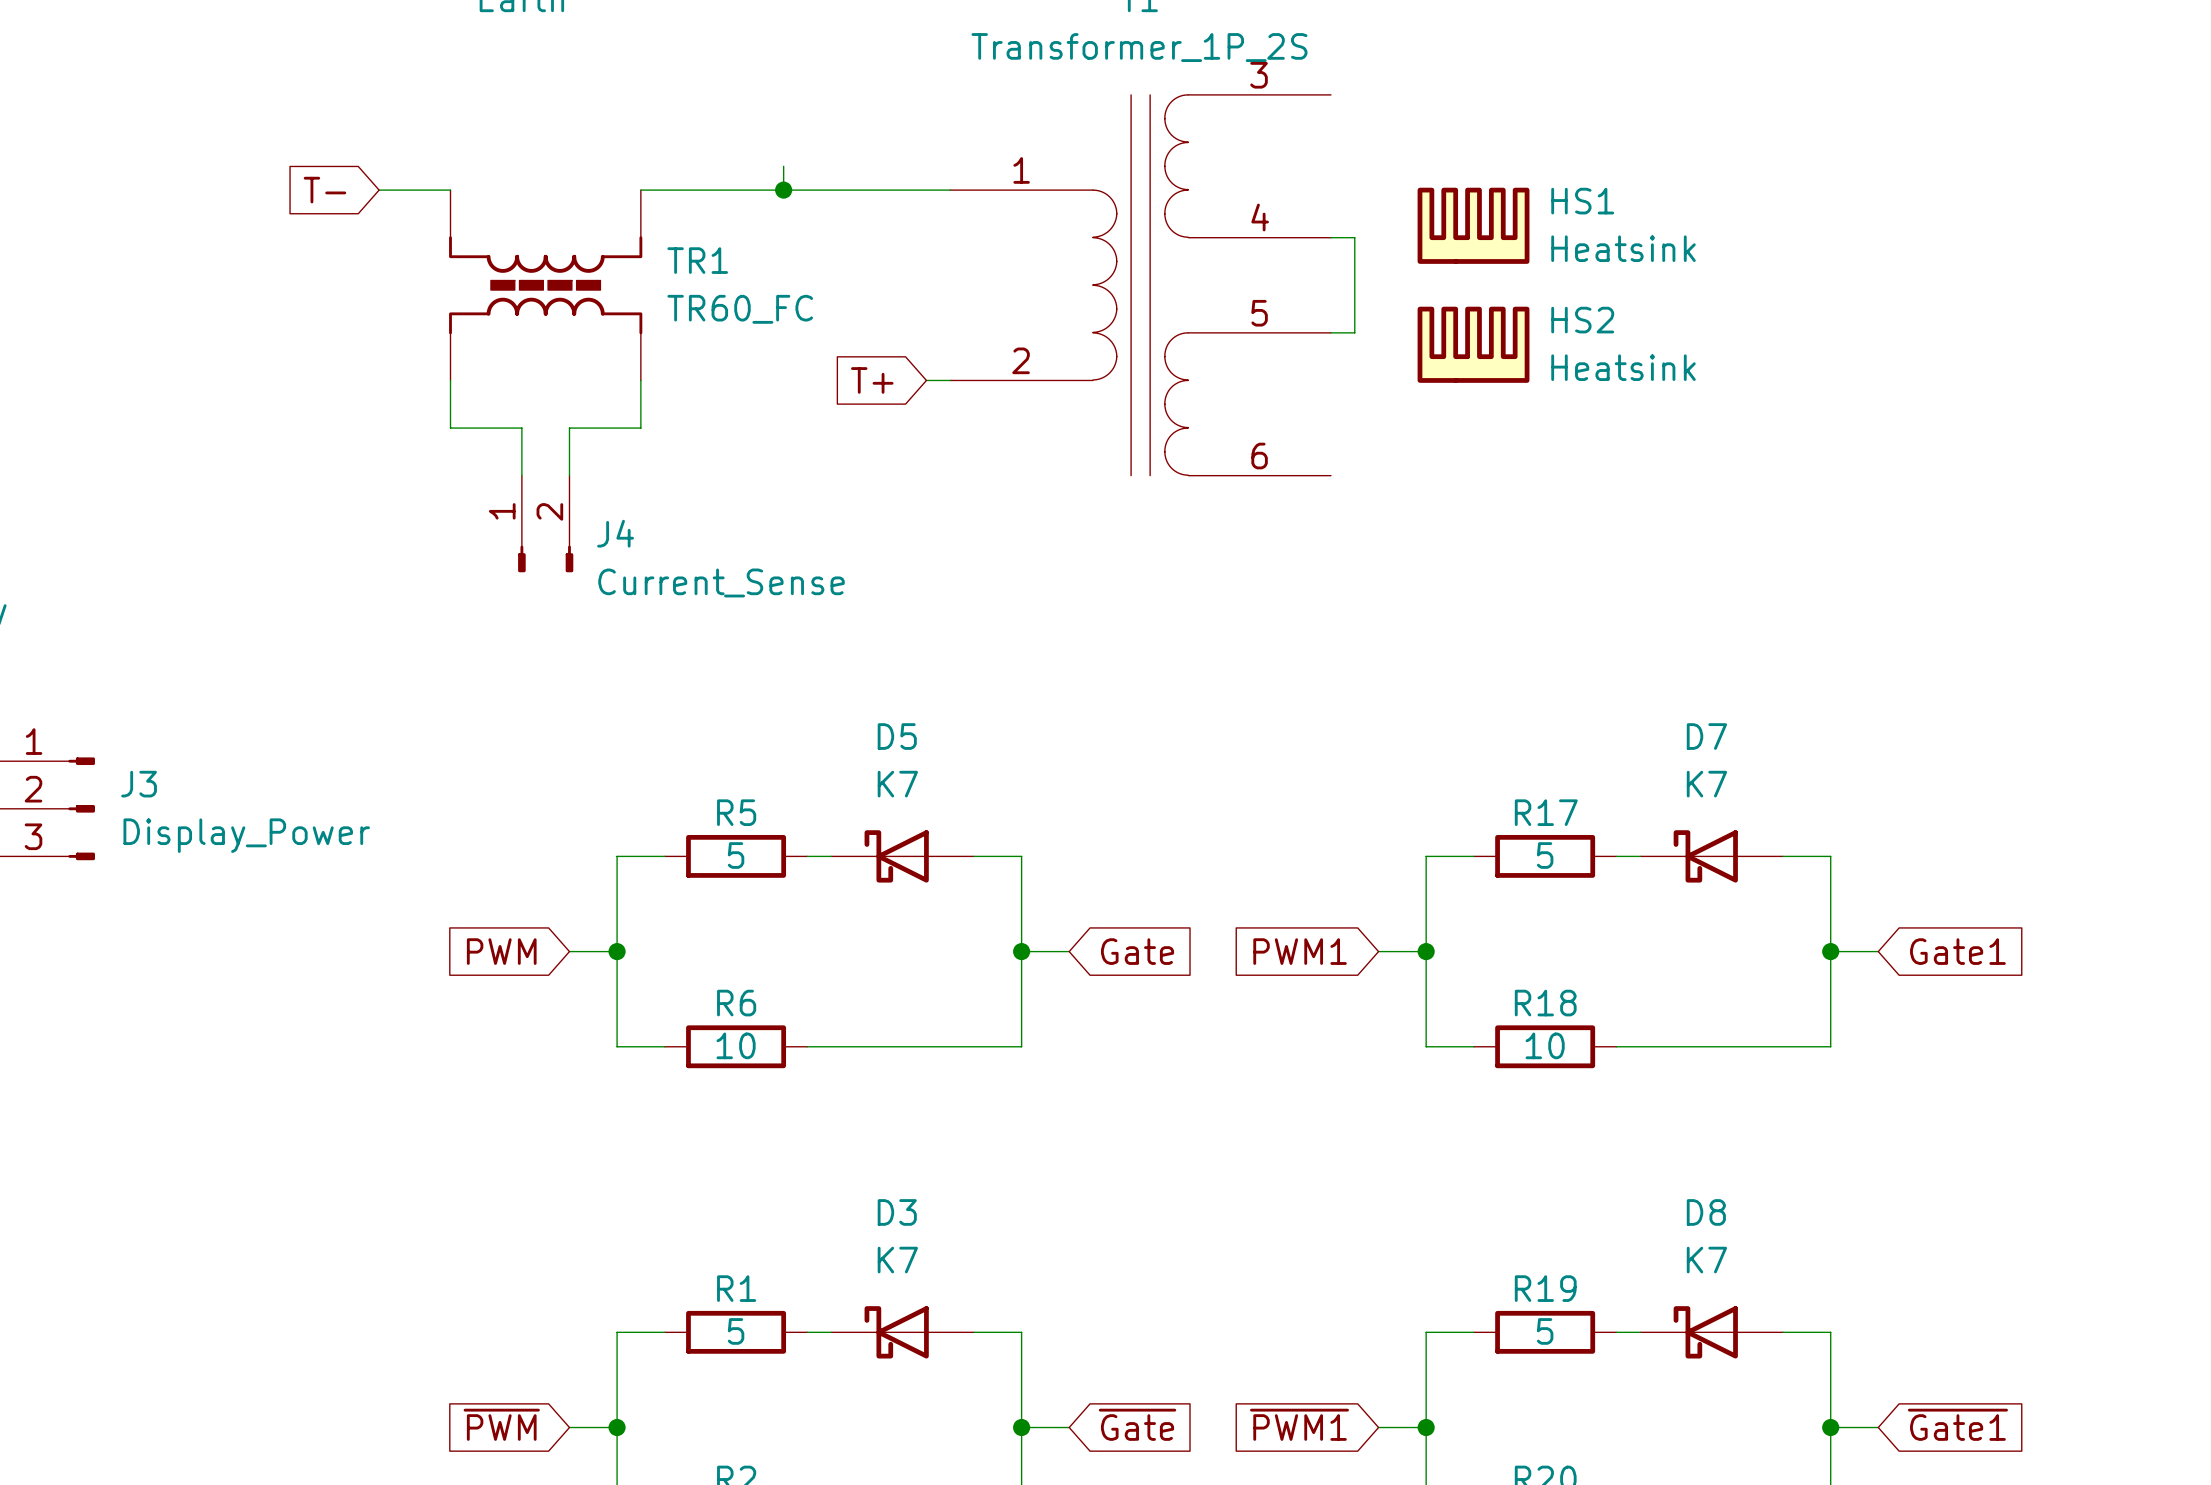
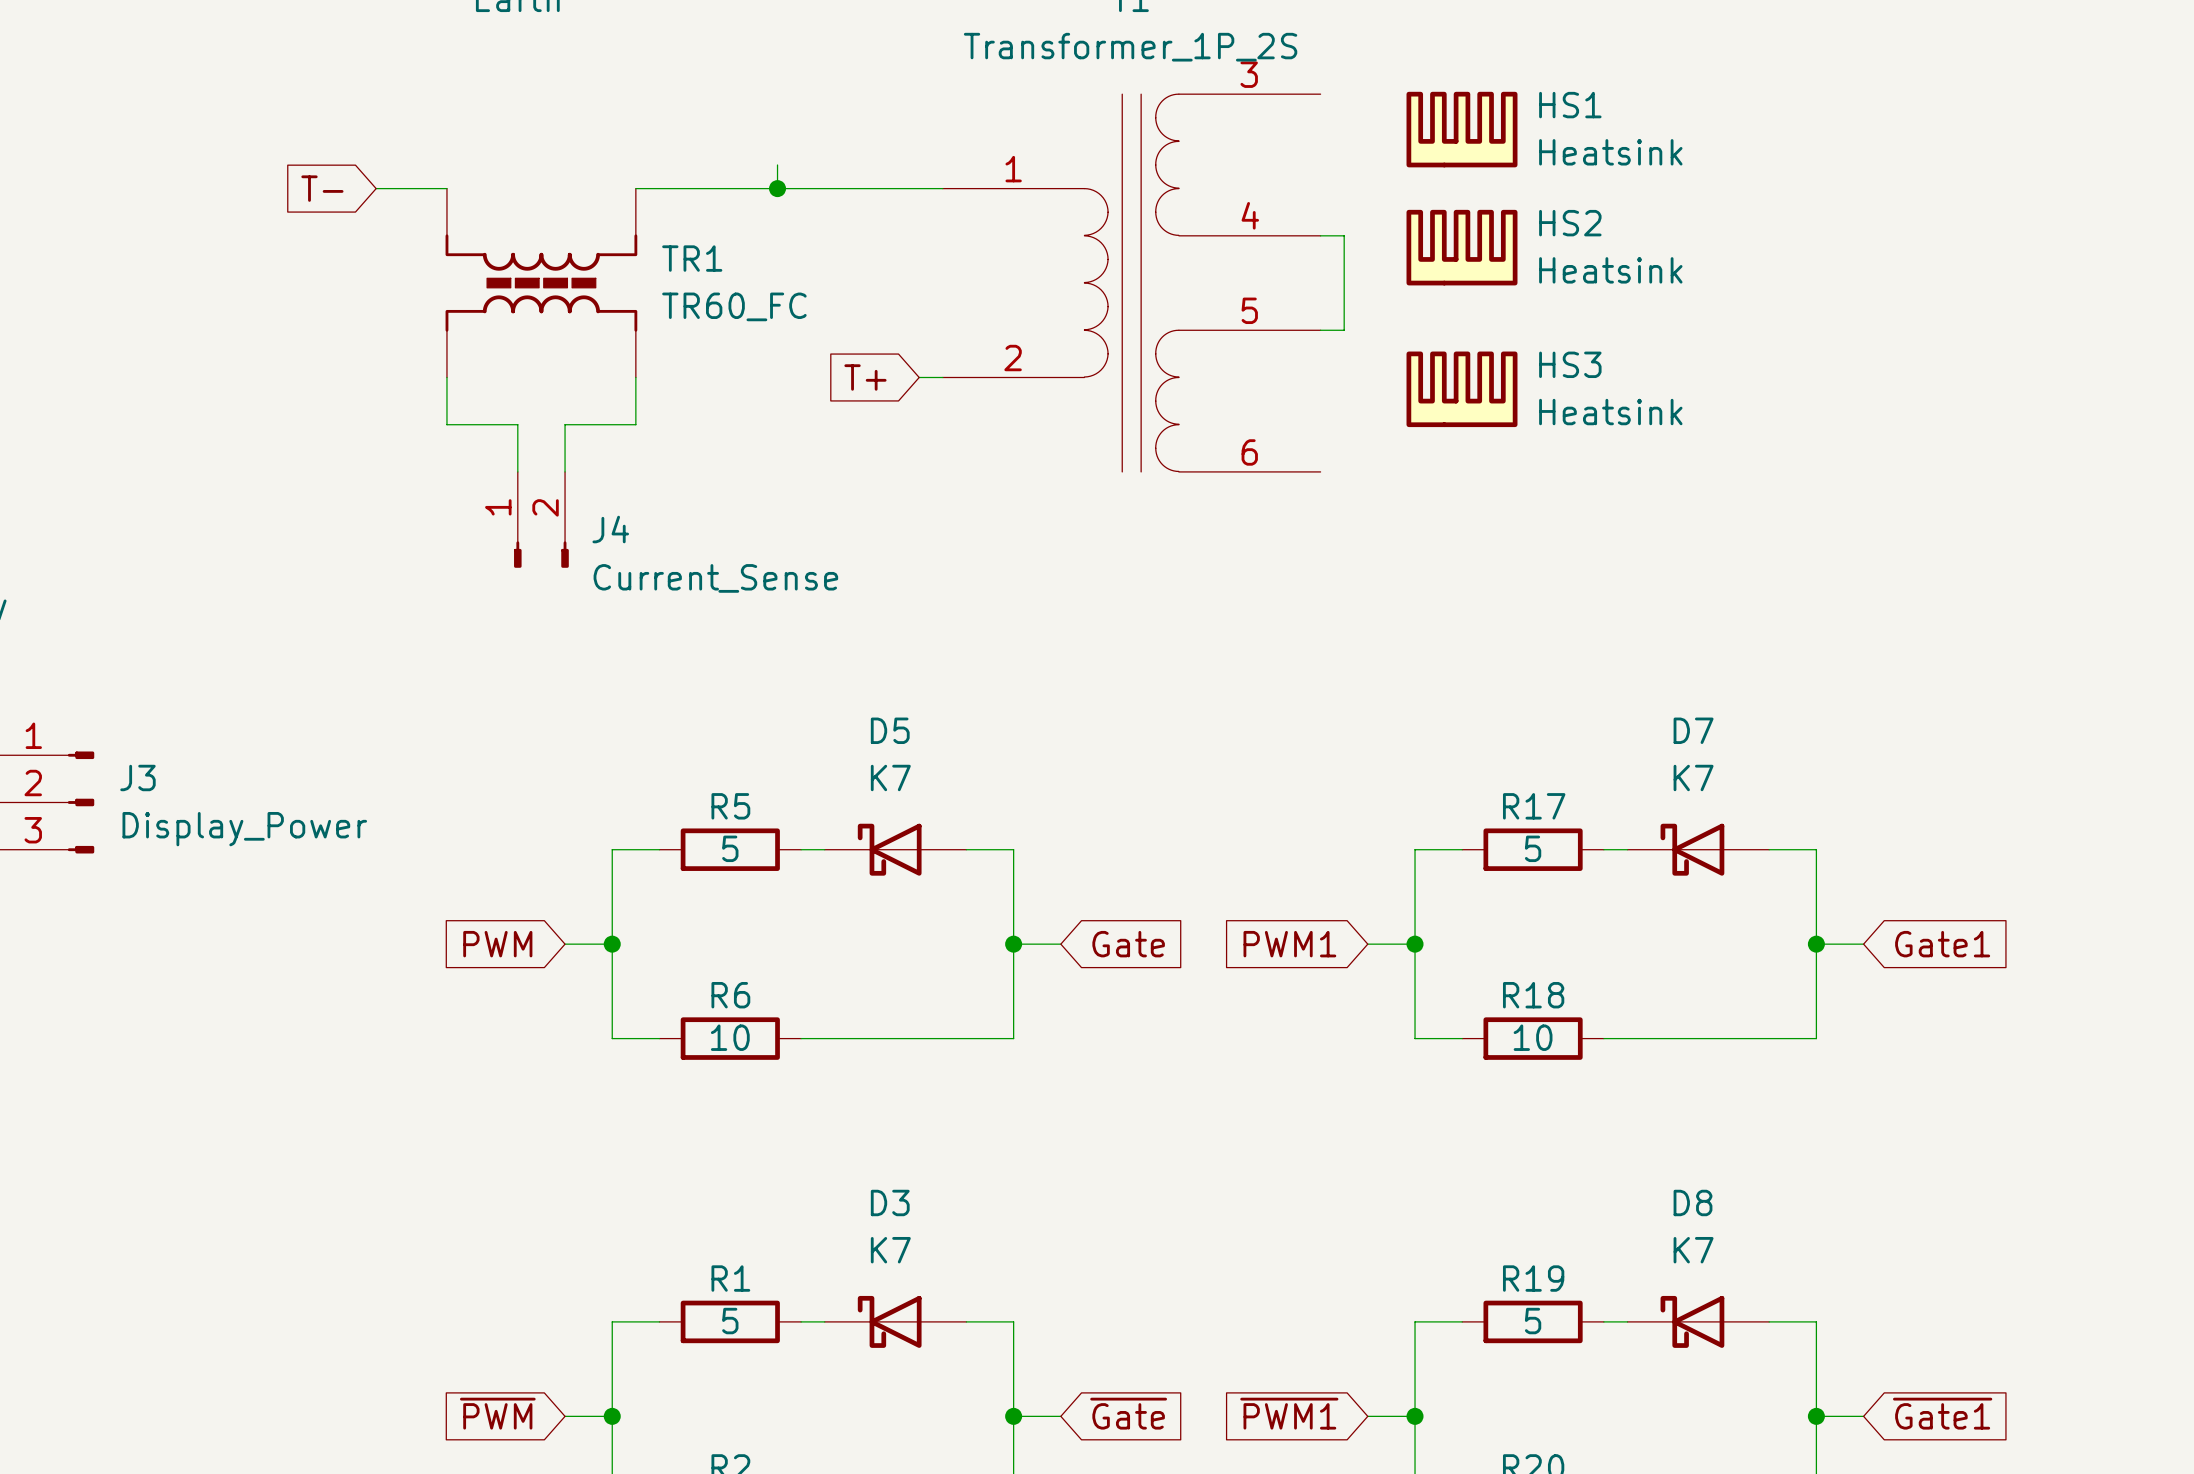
HS1 position: (1473, 225) -> (1462, 129)
HS2 position: (1473, 344) -> (1462, 247)
HS3: none -> Heatsink (1462, 389)

